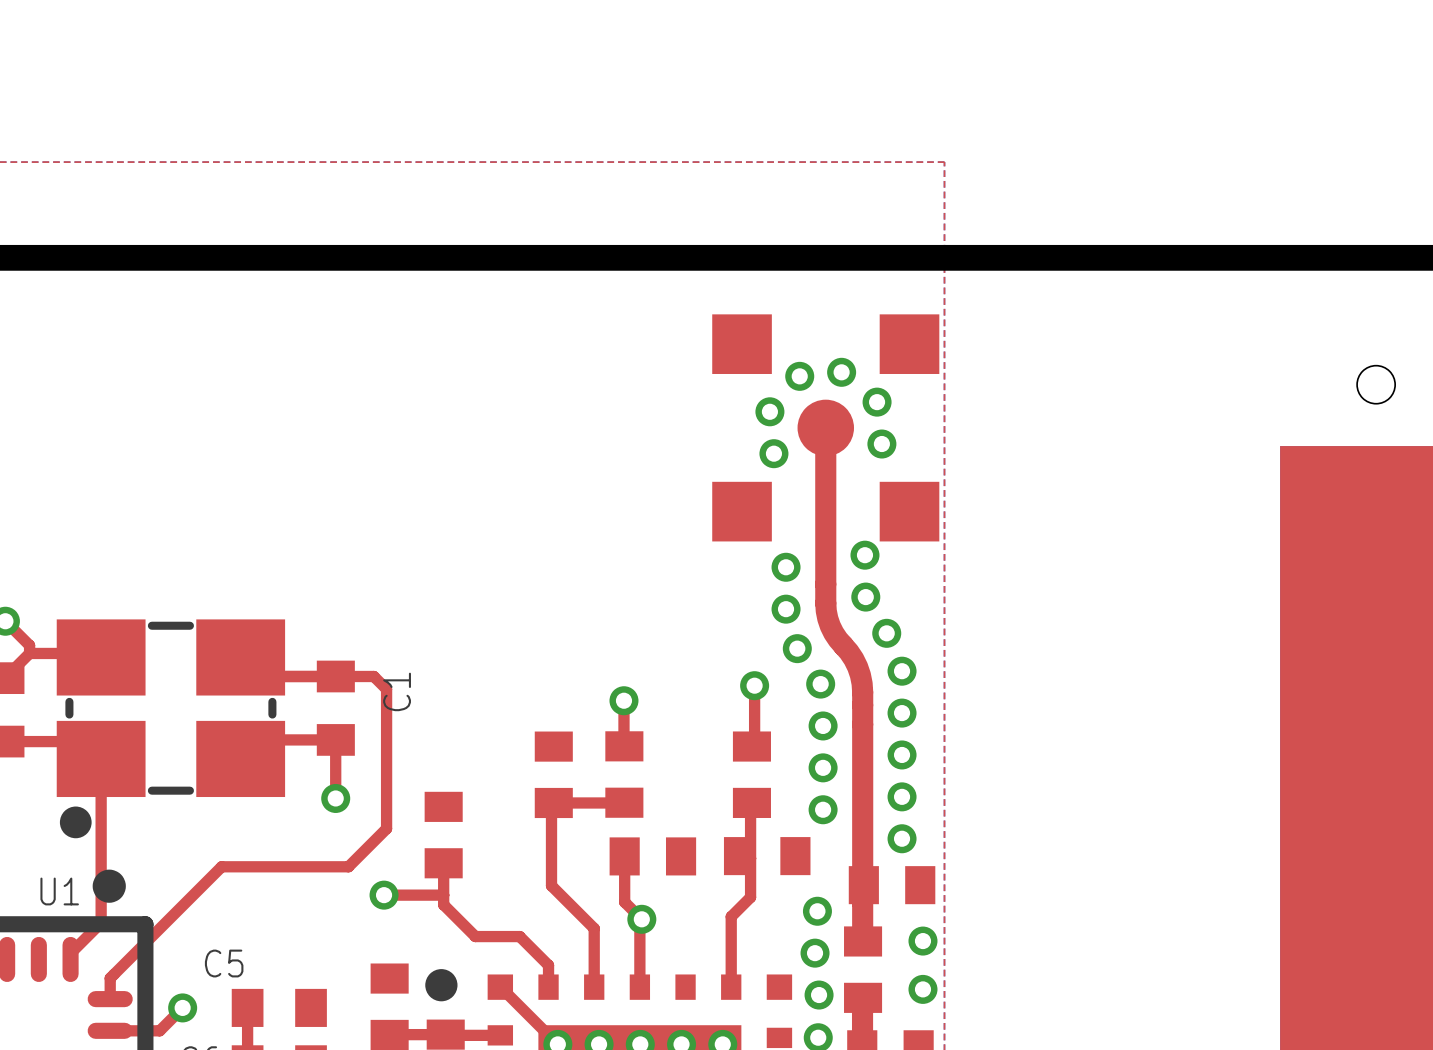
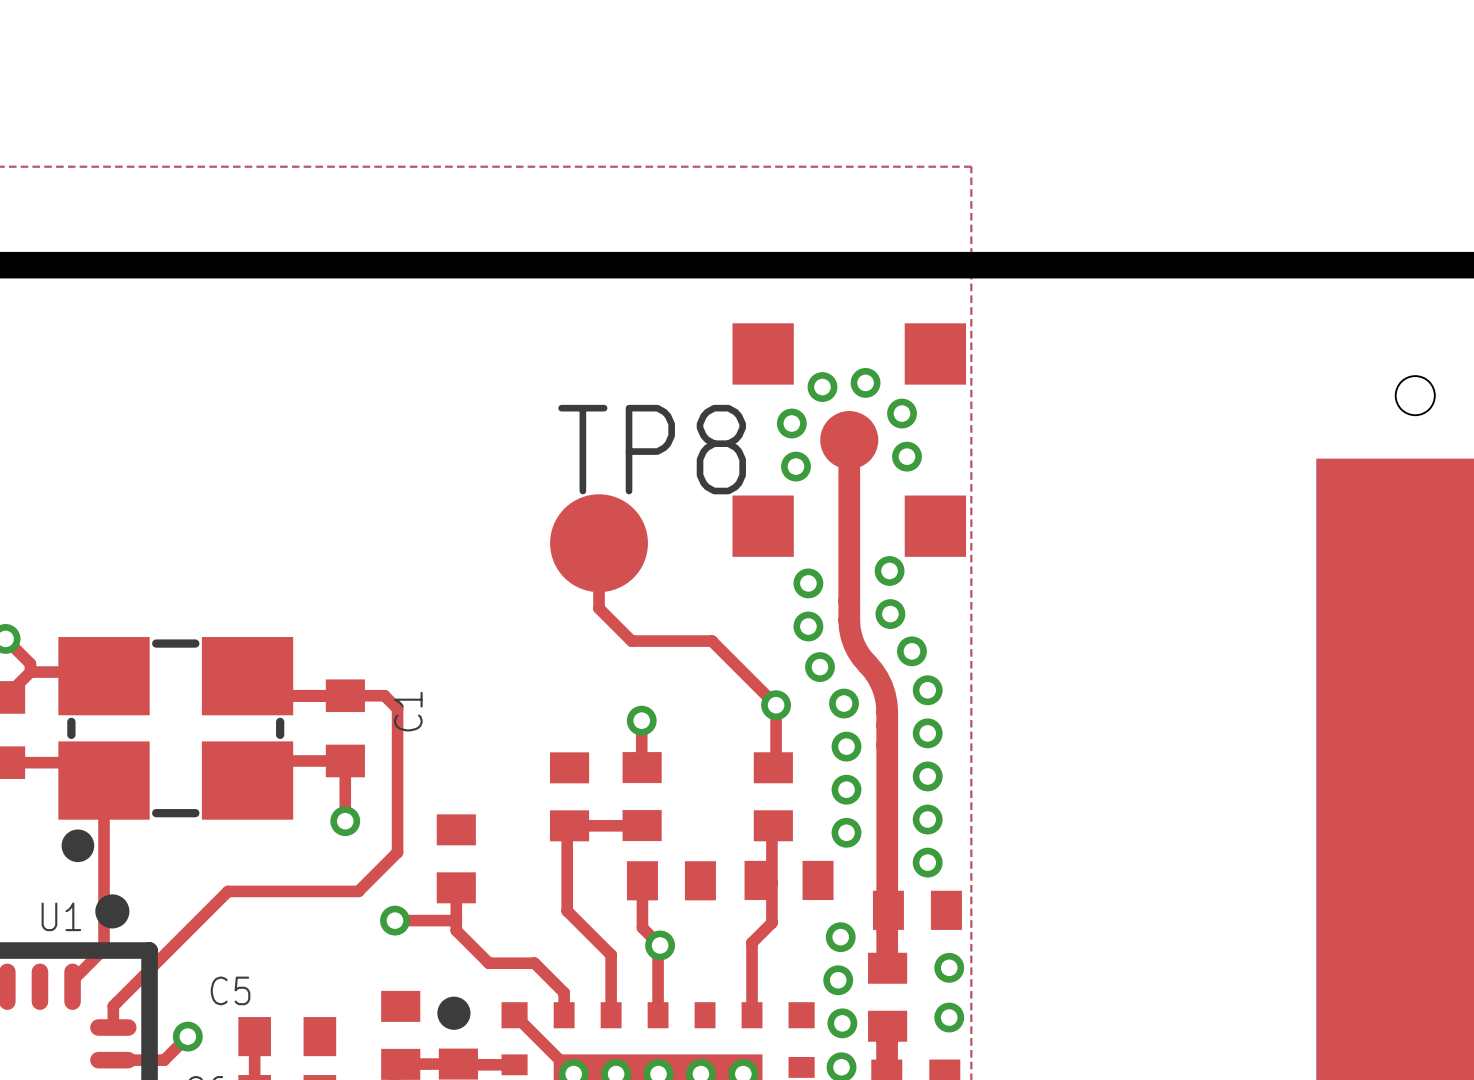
top track: none -> (599, 543) (599, 608) (631, 641) (711, 641) (776, 705)
TP8: none -> (599, 543)

